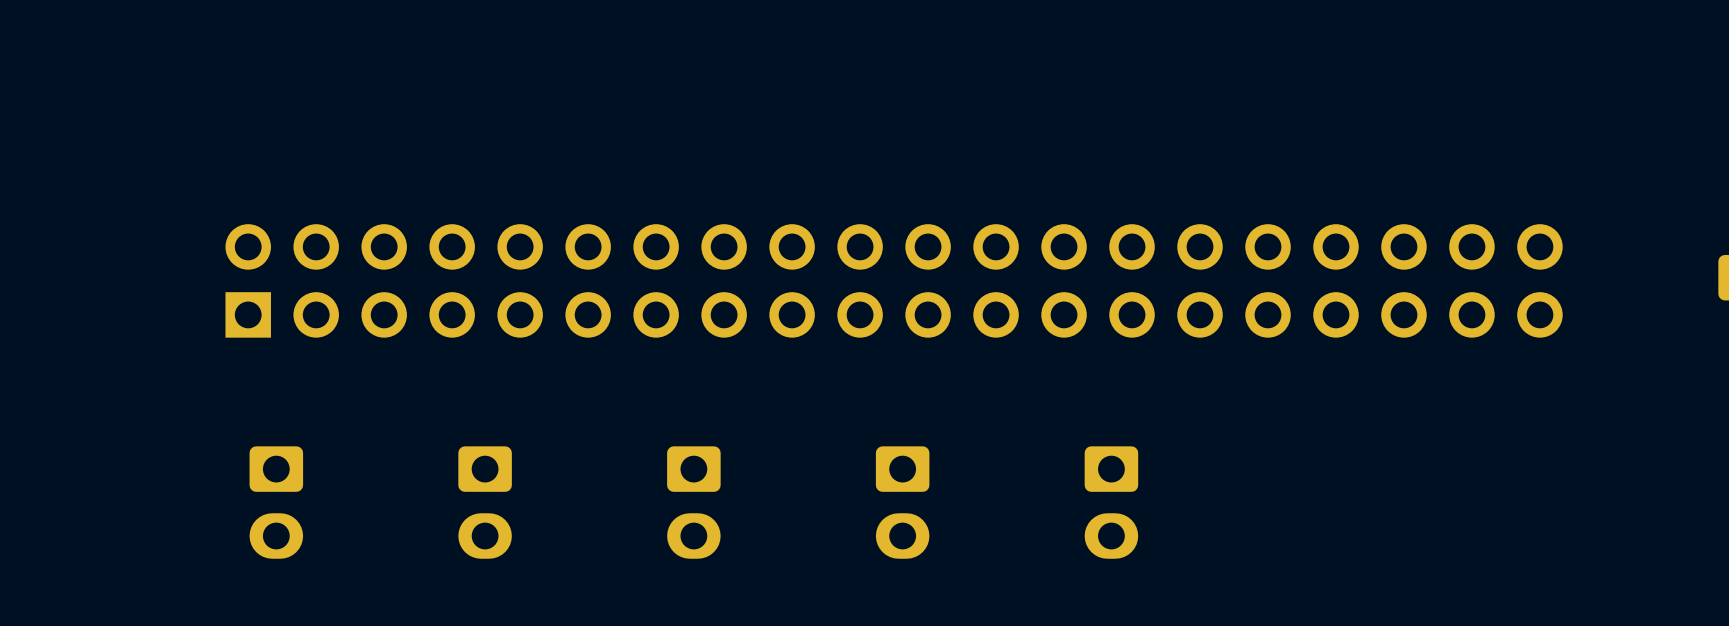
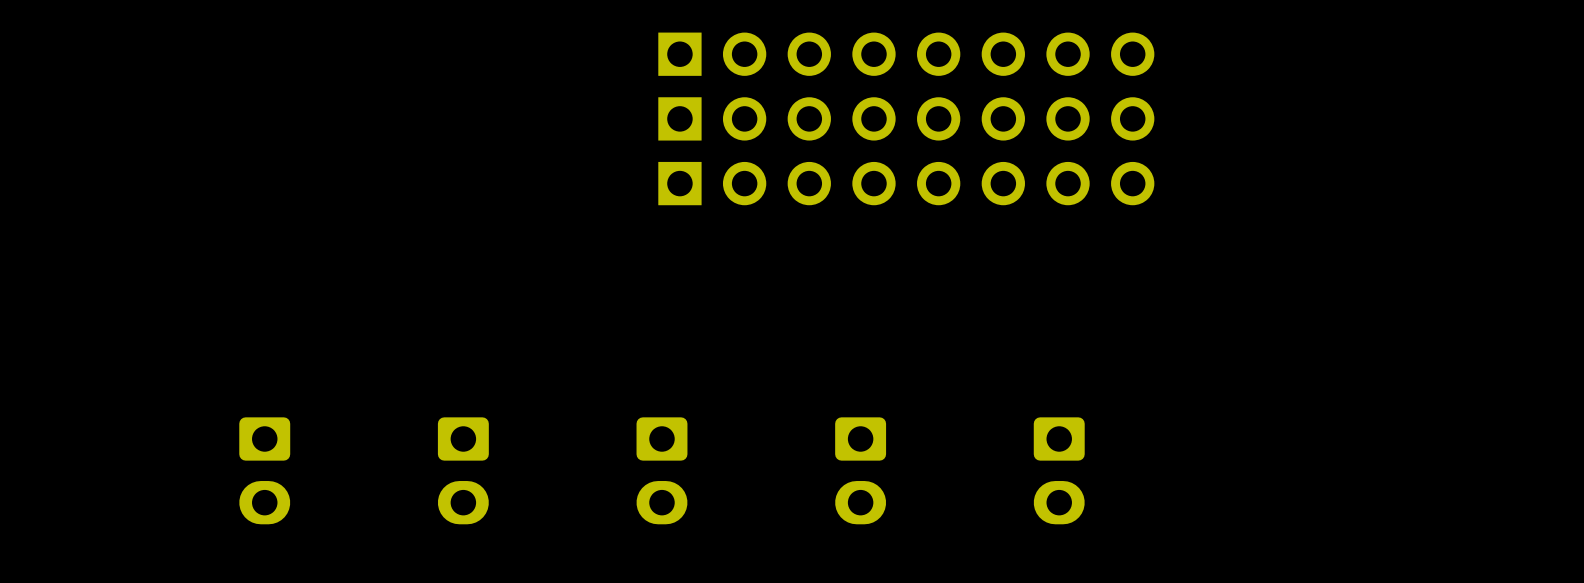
part: none -> (906, 54)
part: none -> (906, 118)
part: none -> (906, 183)
part: (894, 280) -> none

